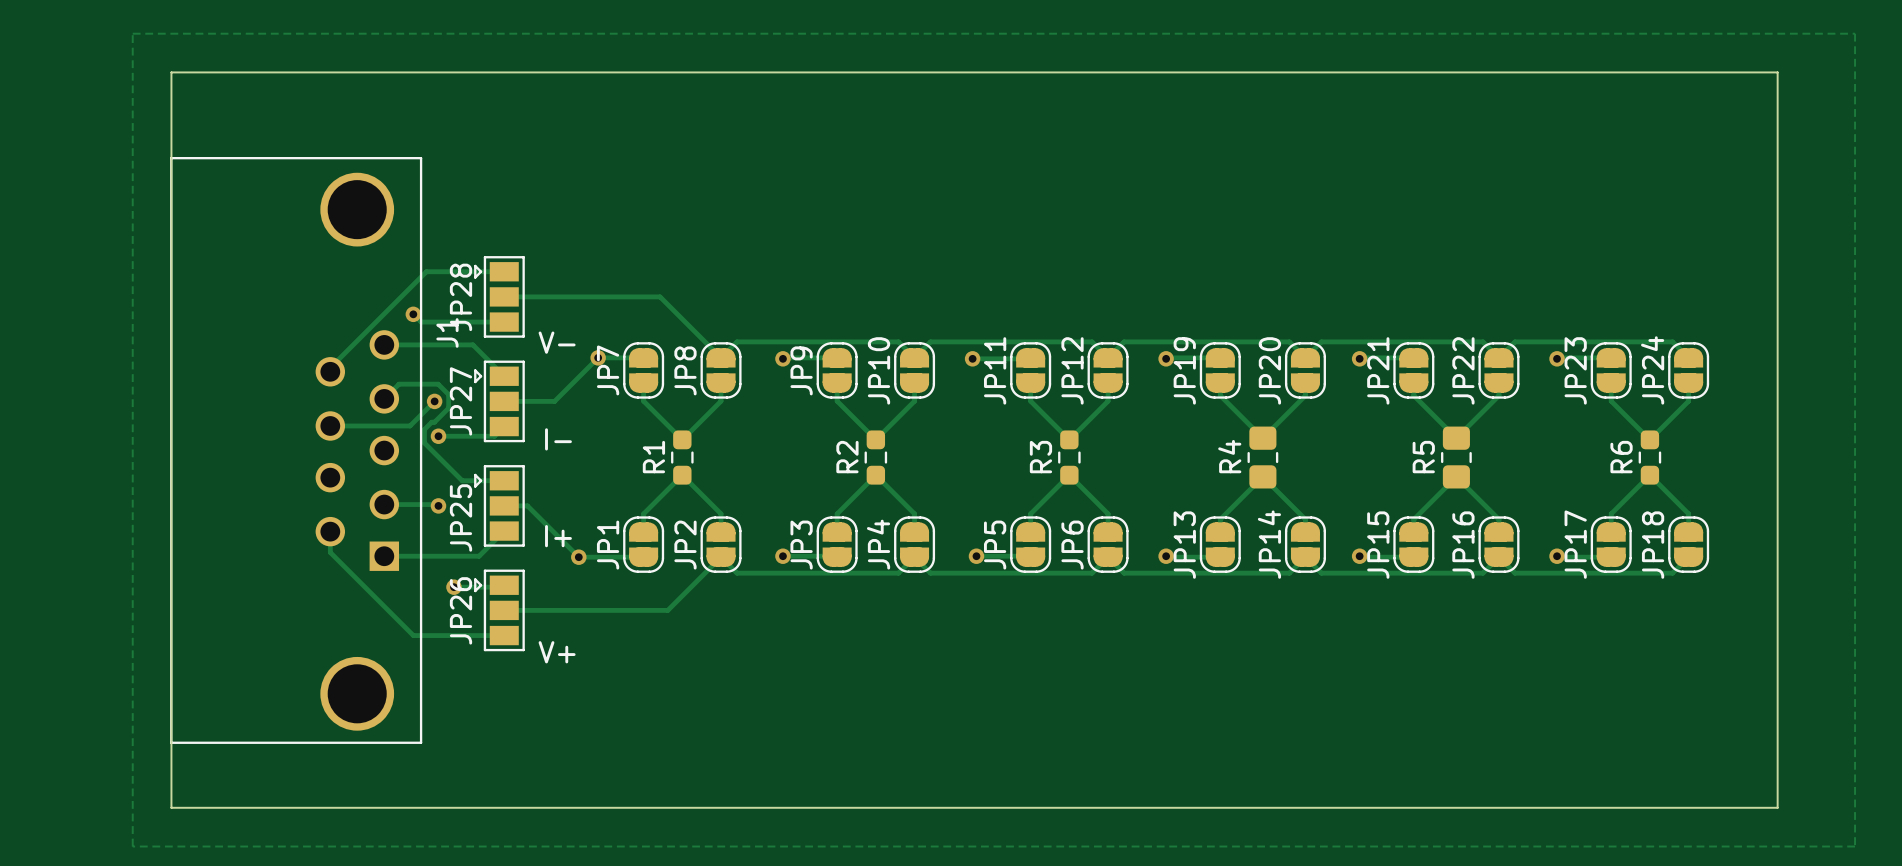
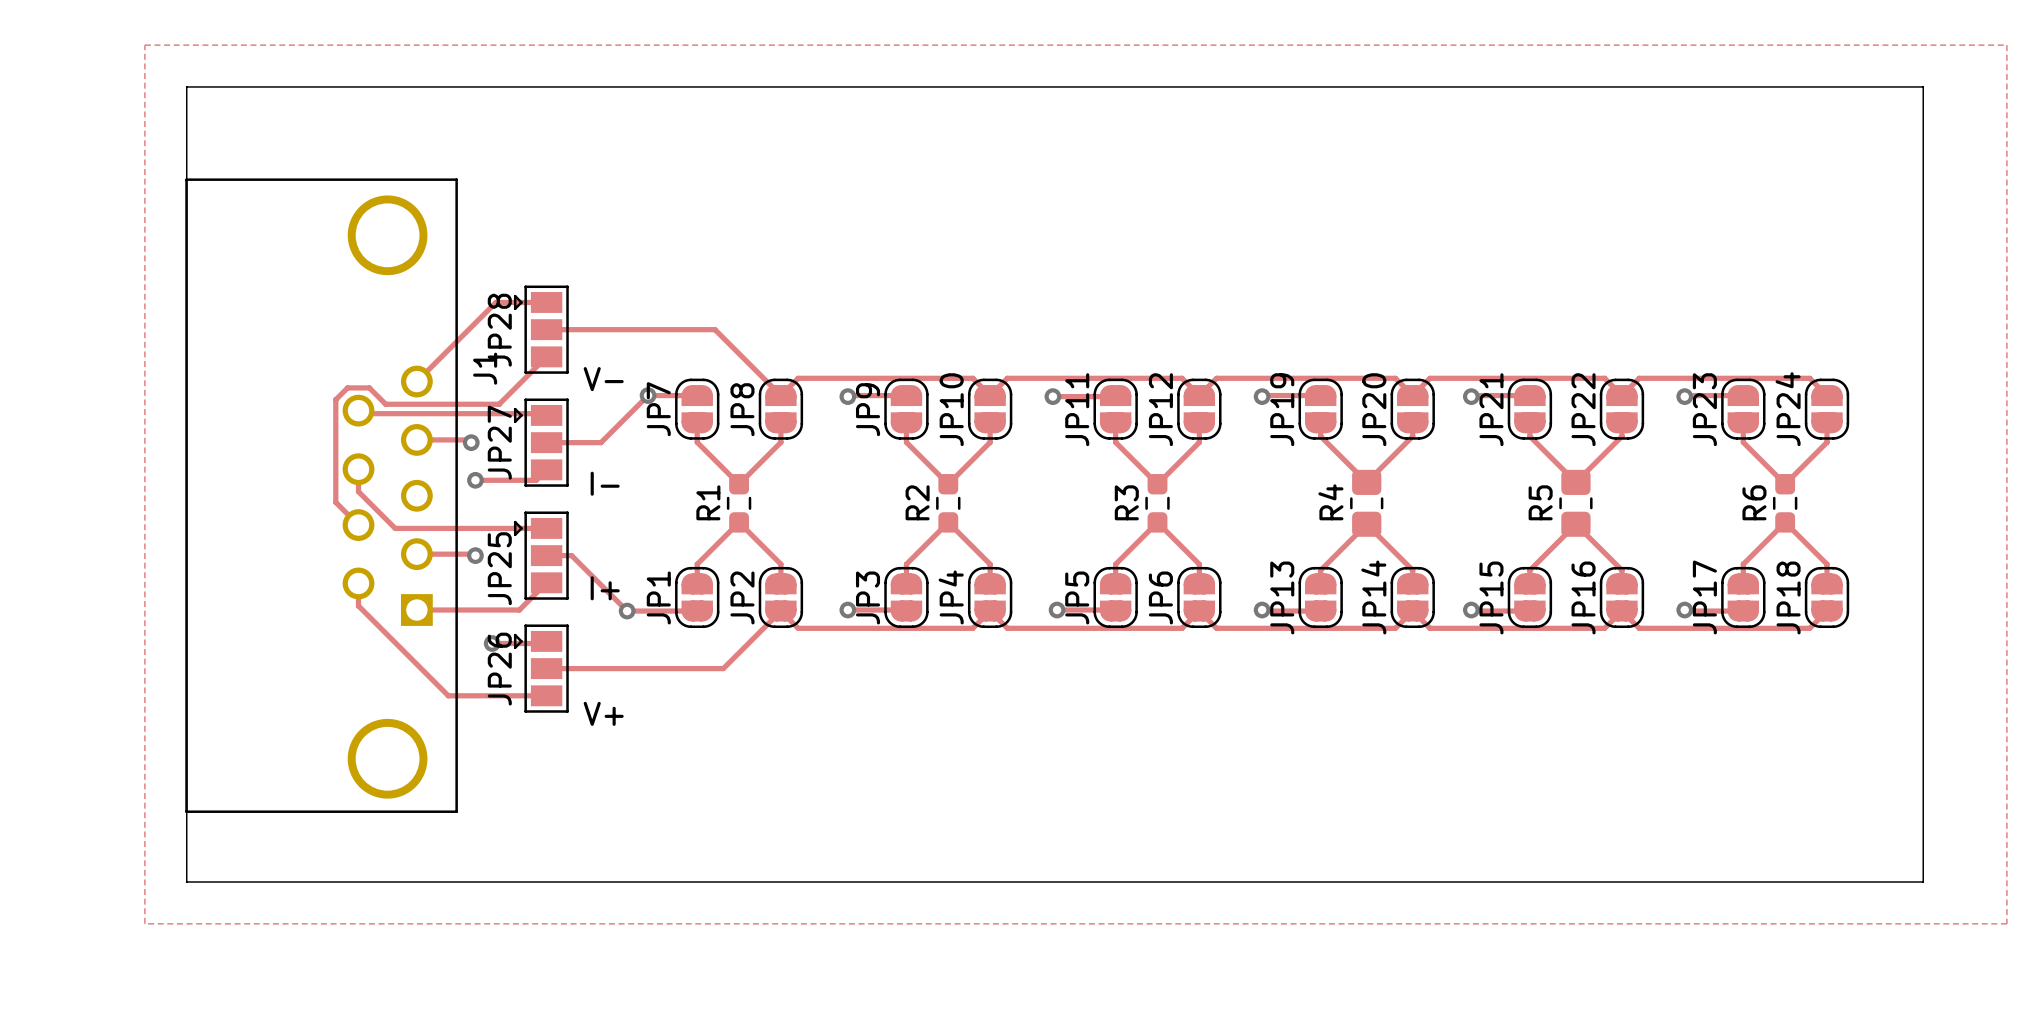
track: (457, 271) (426, 271) (330, 367) (330, 371) -> (495, 302) (416, 381)
track: (413, 314) (421, 322) (504, 322) -> (358, 525) (335, 502) (335, 399) (347, 387) (369, 387) (385, 404) (499, 404) (546, 356)
via: (413, 314) -> none
track: (384, 344) (472, 344) (502, 374) -> (361, 413) (544, 413)
track: (384, 398) (399, 384) (438, 384) (448, 394) (448, 408) (424, 429) (424, 442) (462, 480) -> (358, 469) (358, 491) (395, 528) (501, 528)
track: none -> (416, 439) (468, 439)
track: (434, 401) (410, 425) (330, 425) -> none

